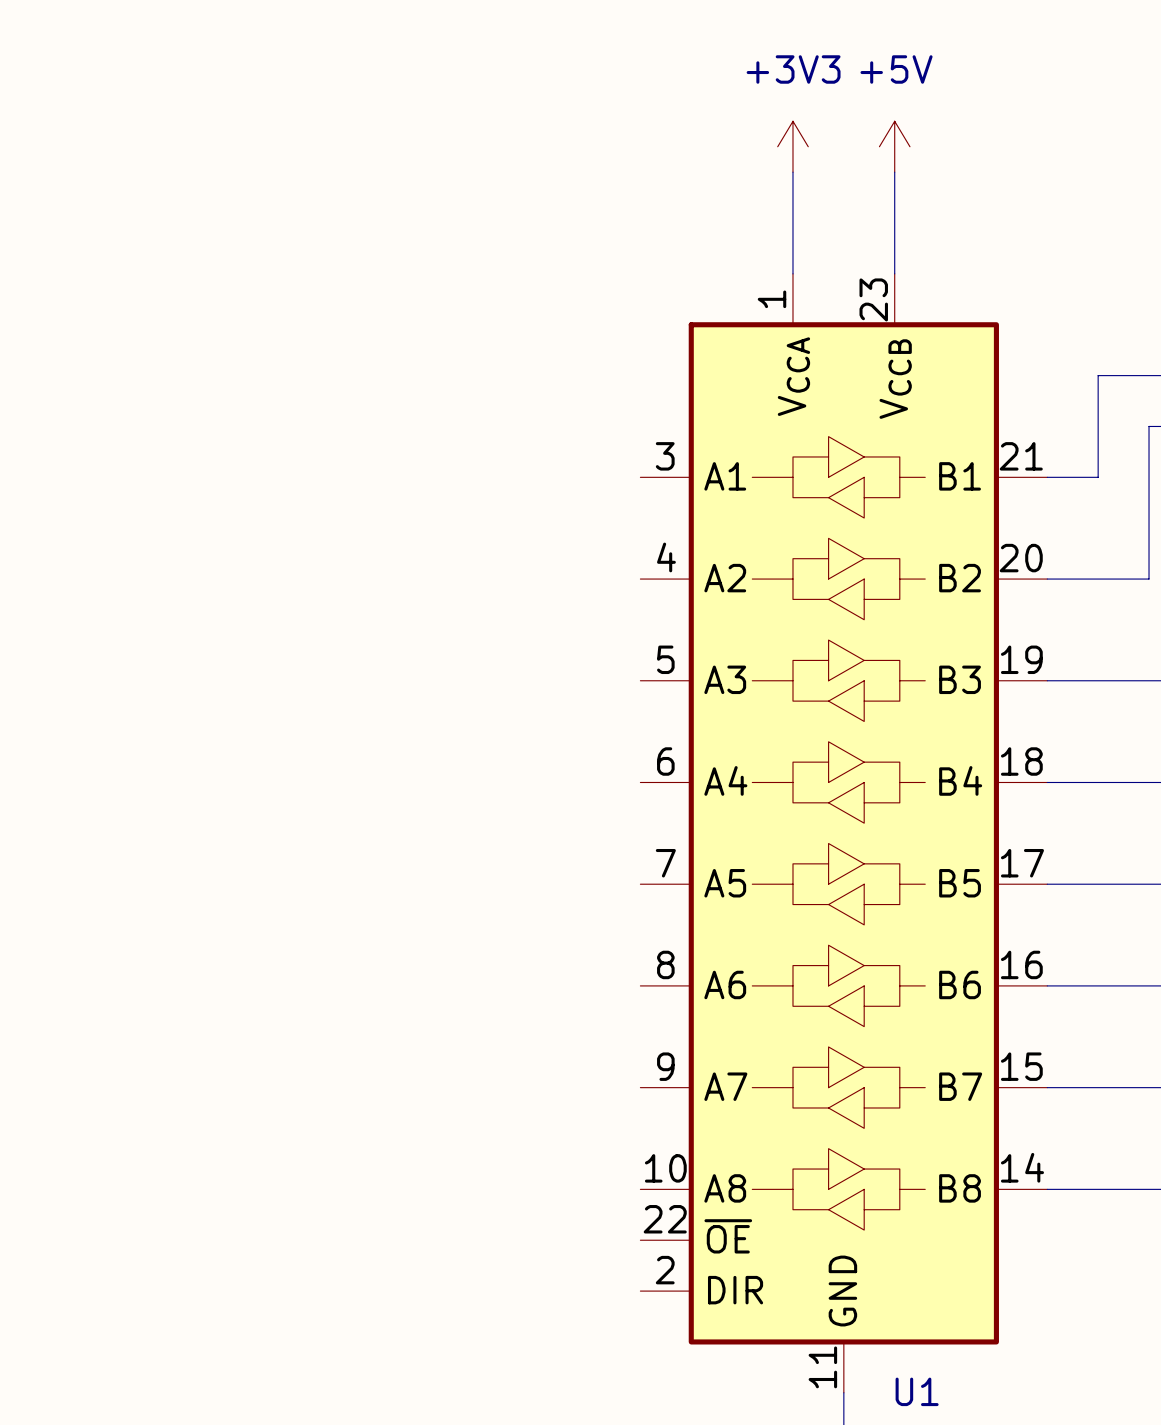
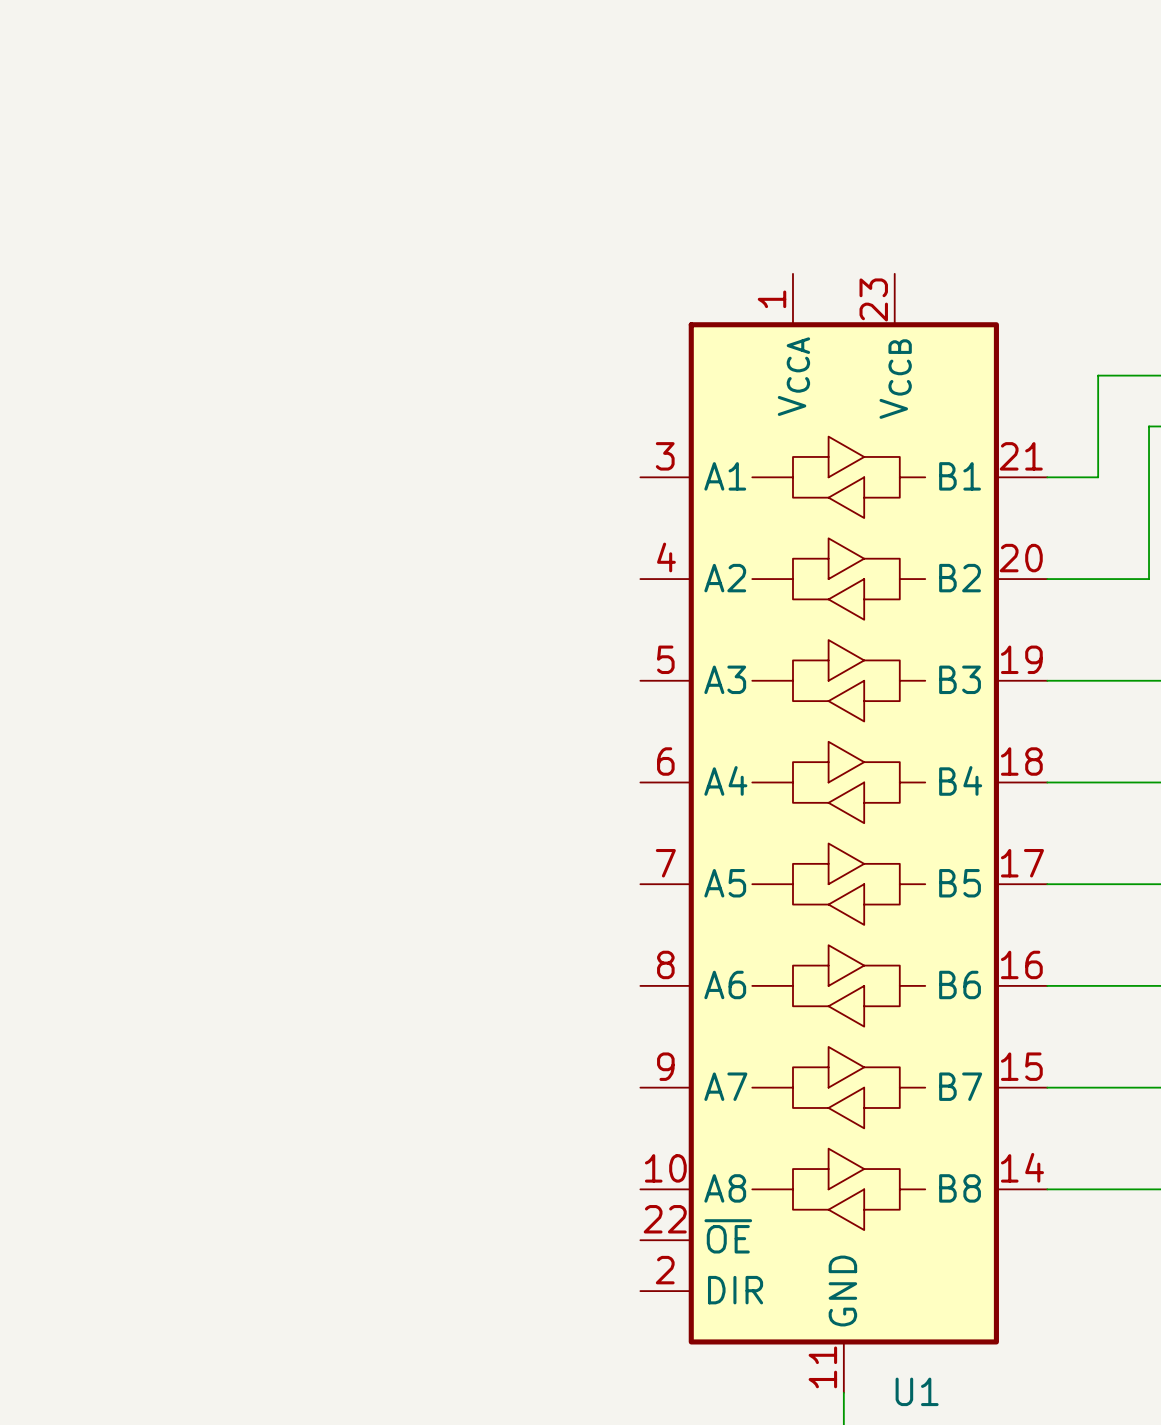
power symbol: +3V3 (792, 146) -> none
power symbol: +5V (894, 146) -> none
wire: (792, 172) (792, 273) -> none
wire: (894, 172) (894, 273) -> none

